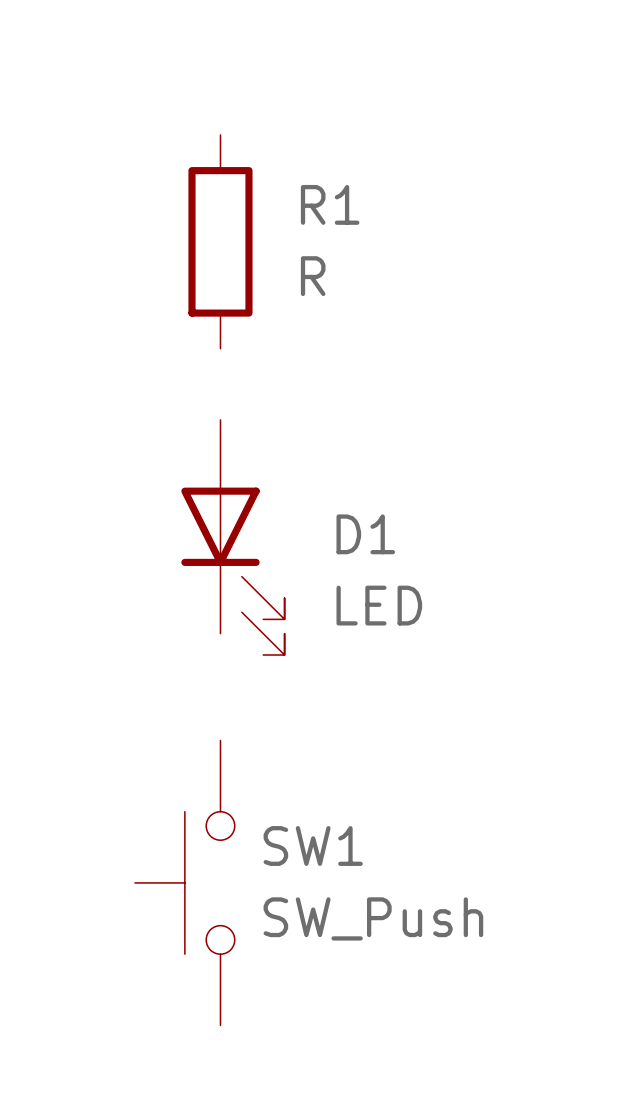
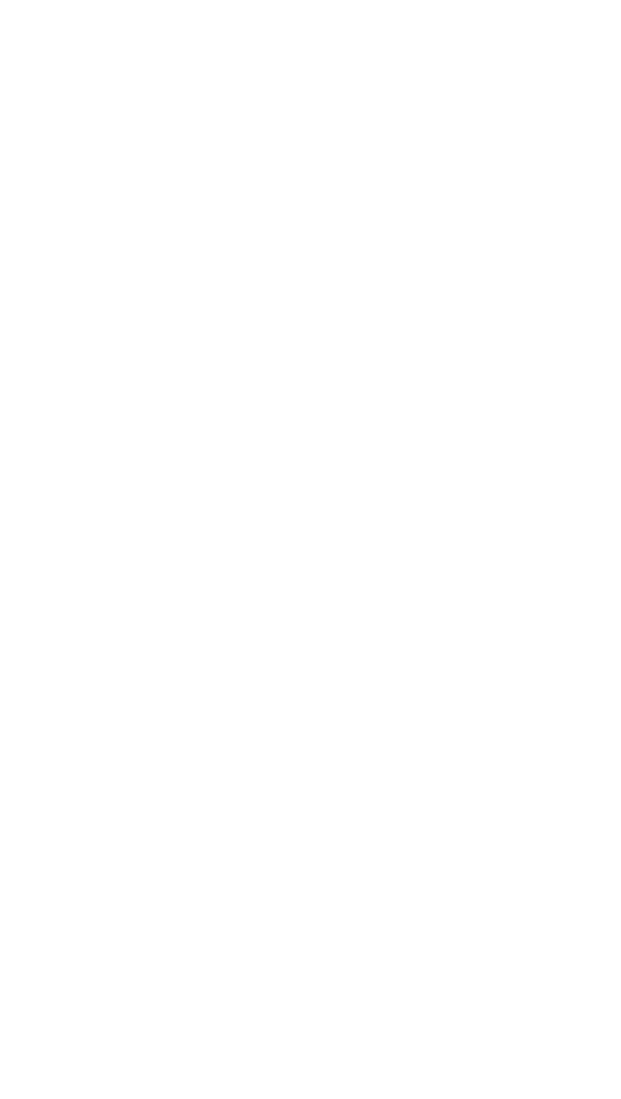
R1: R (220, 241) -> none
D1: LED (232, 537) -> none
SW1: SW_Push (184, 882) -> none

